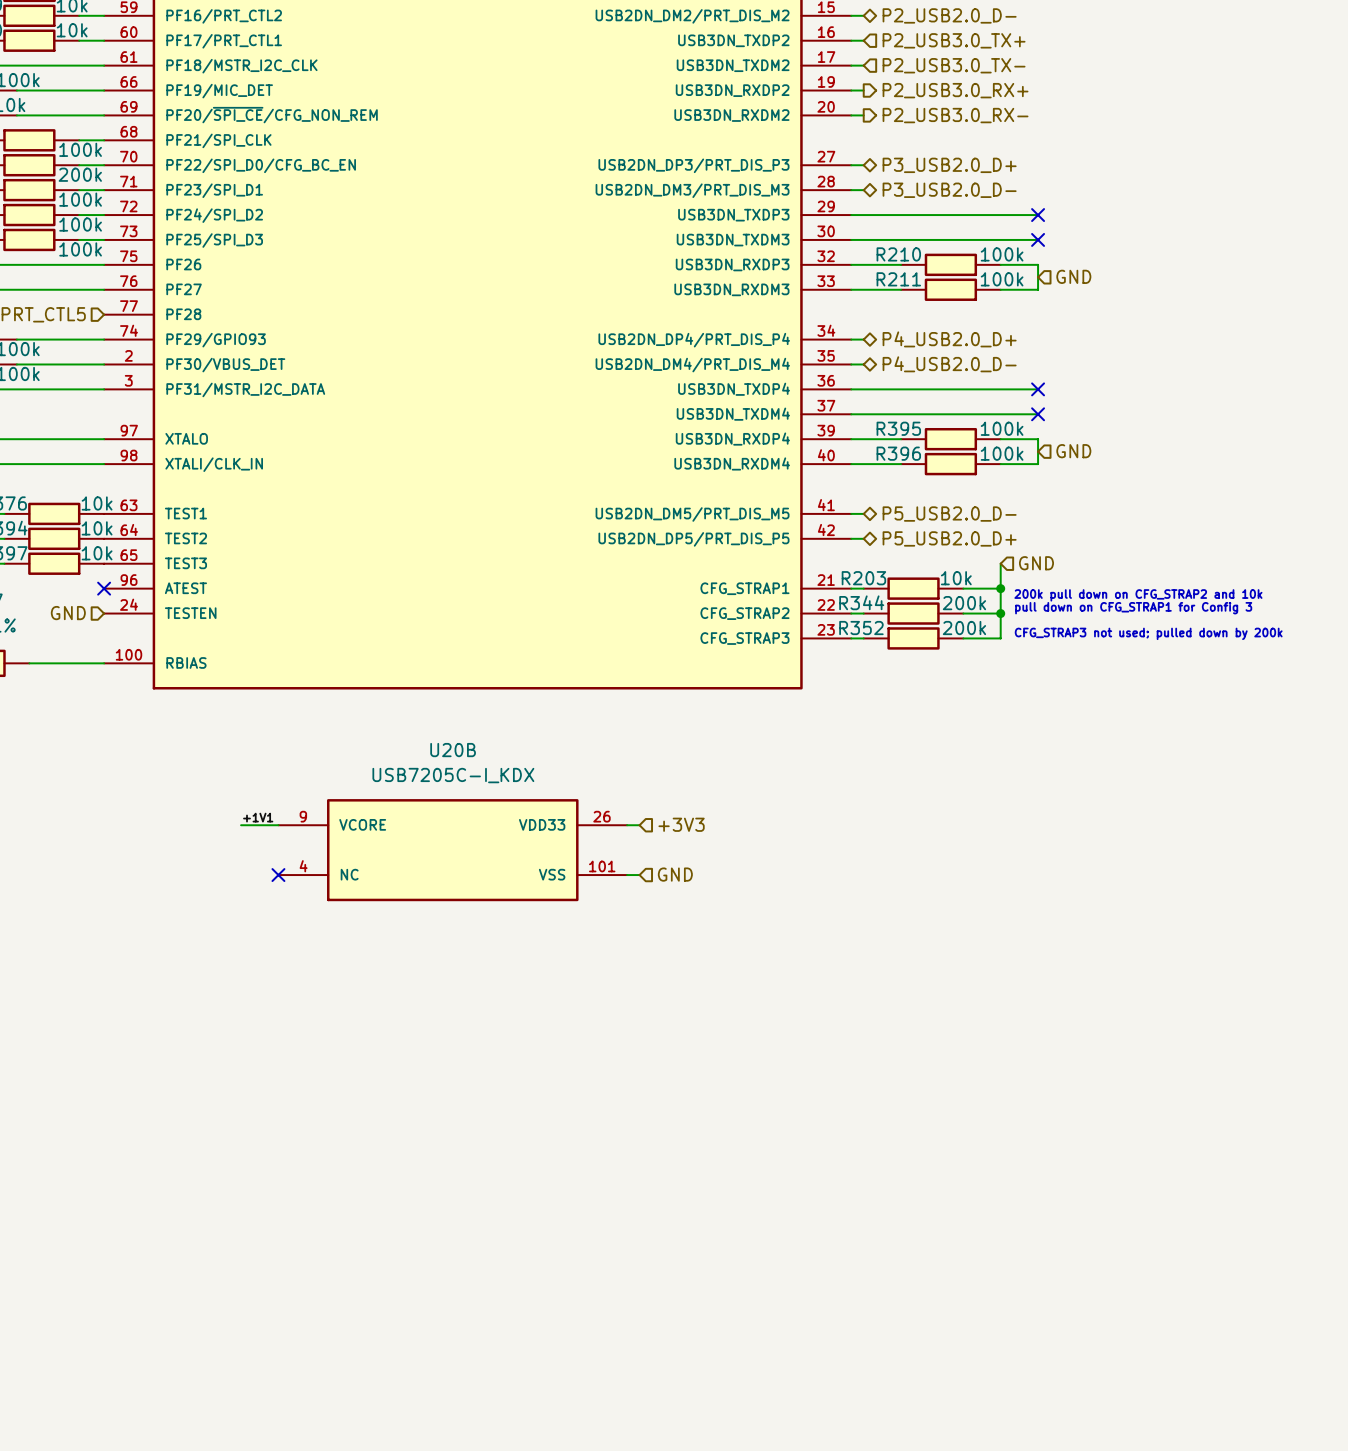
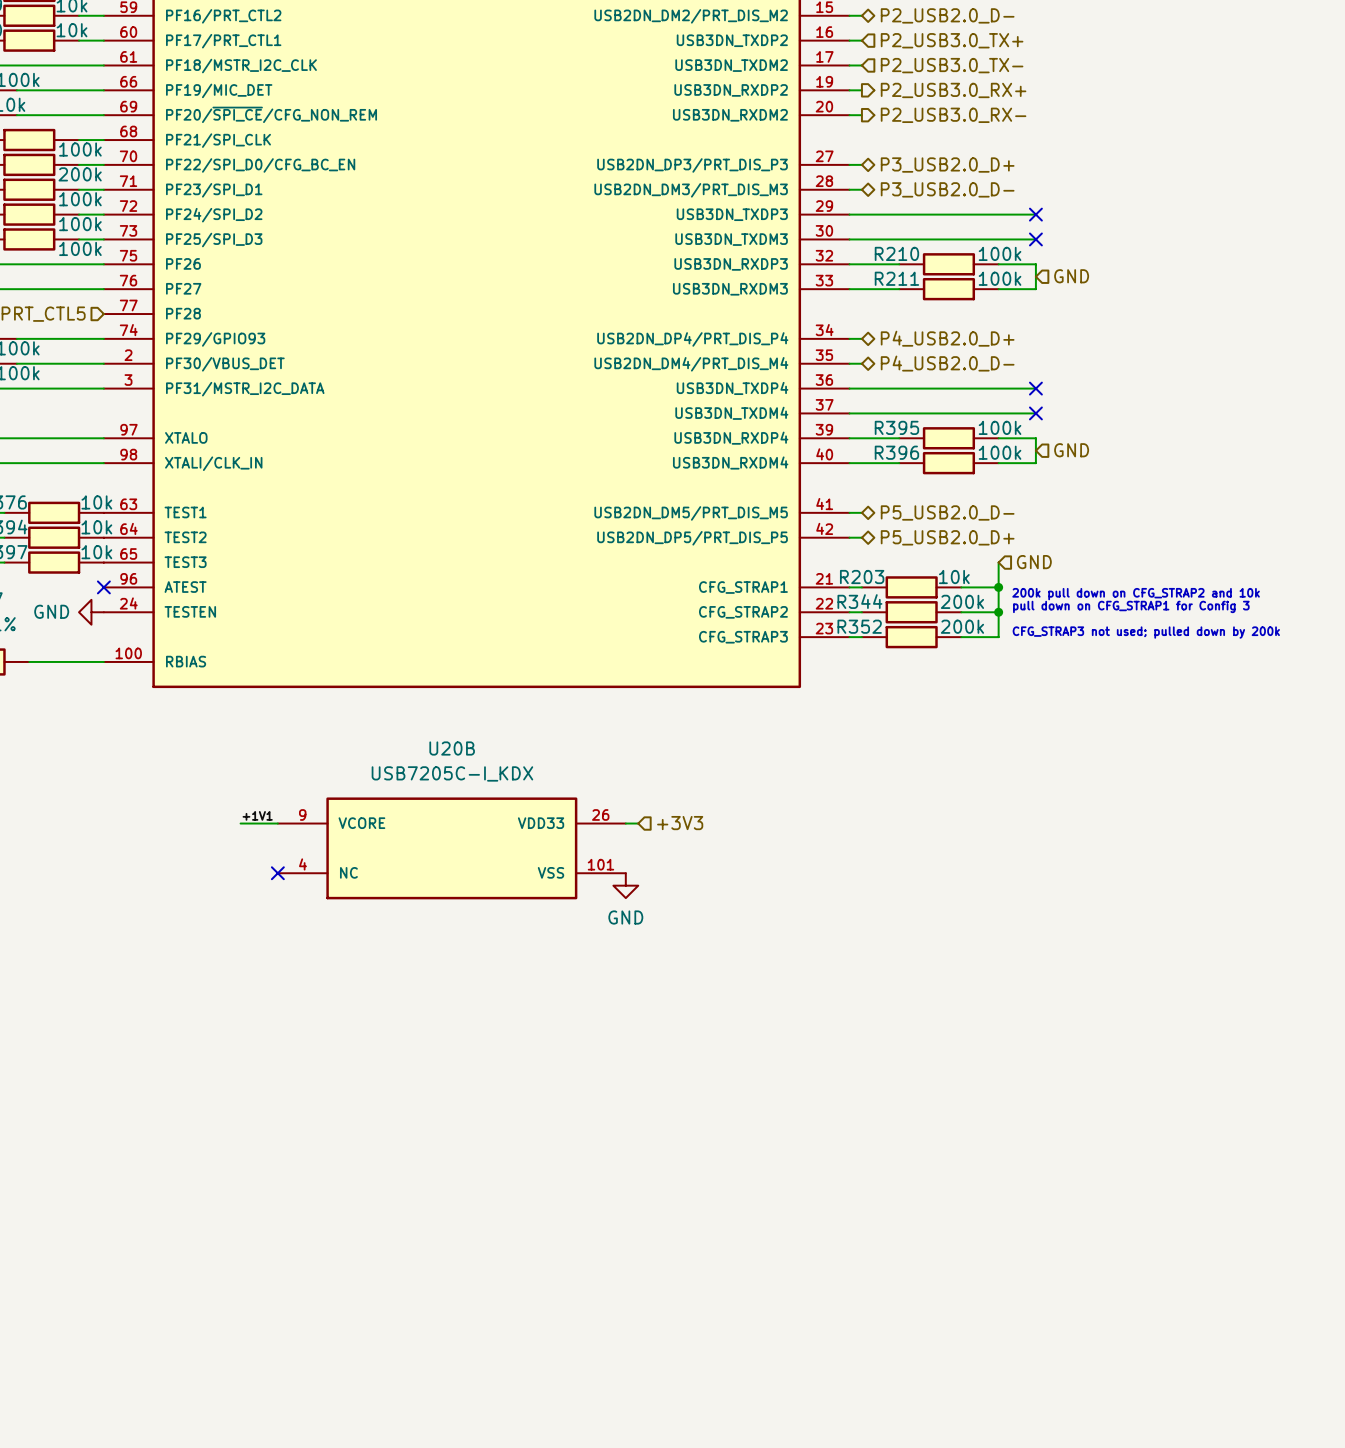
hierarchical label: GND (68, 613) -> none
power symbol: none -> GND (91, 612)
hierarchical label: GND (675, 874) -> none
wire: (627, 875) (639, 875) -> none
power symbol: none -> GND (625, 885)

